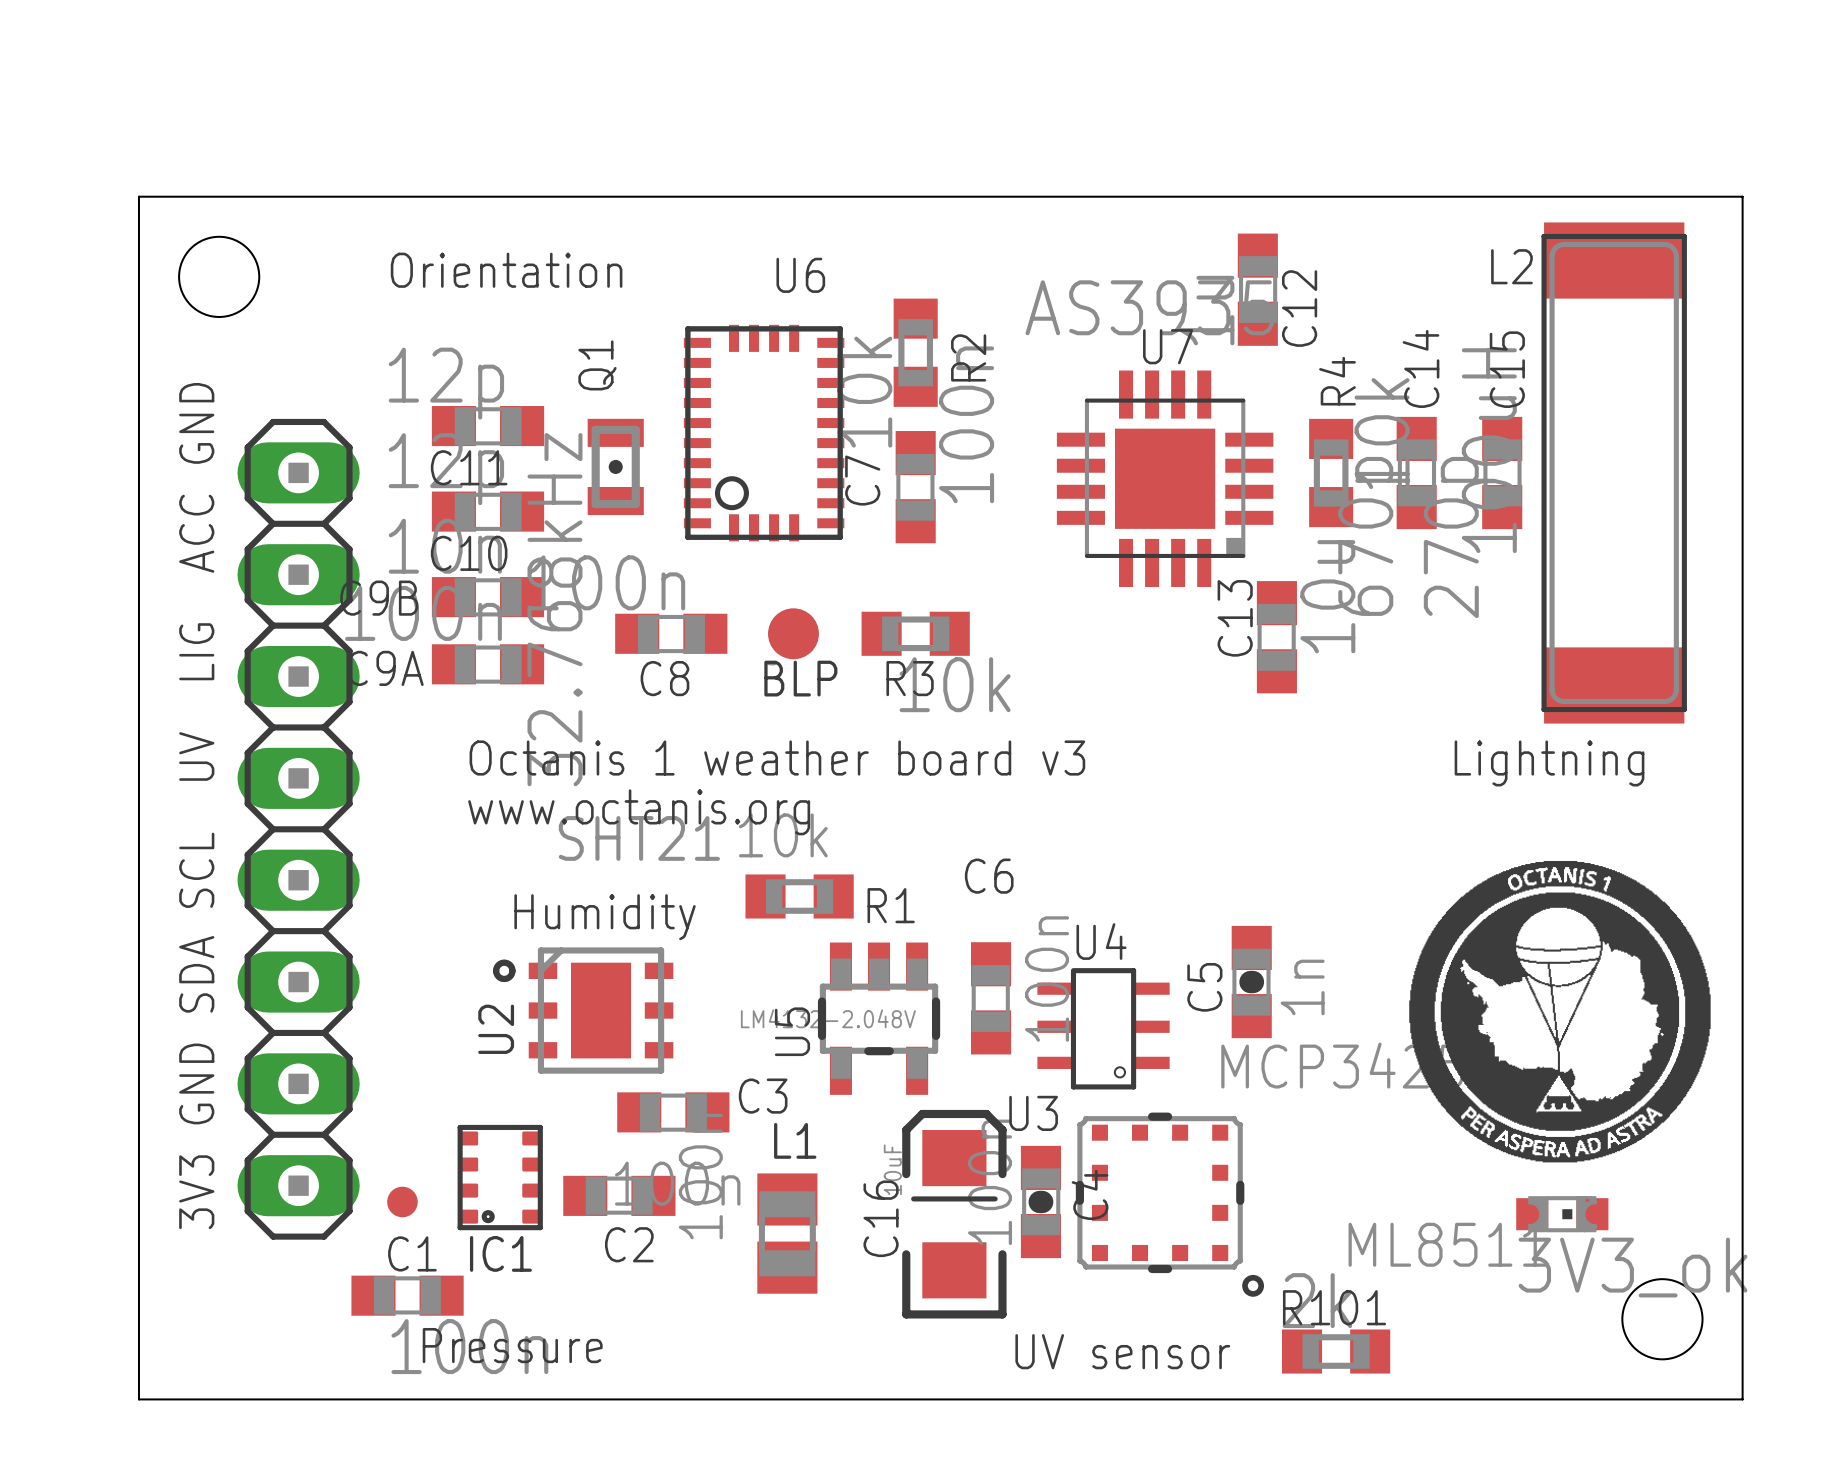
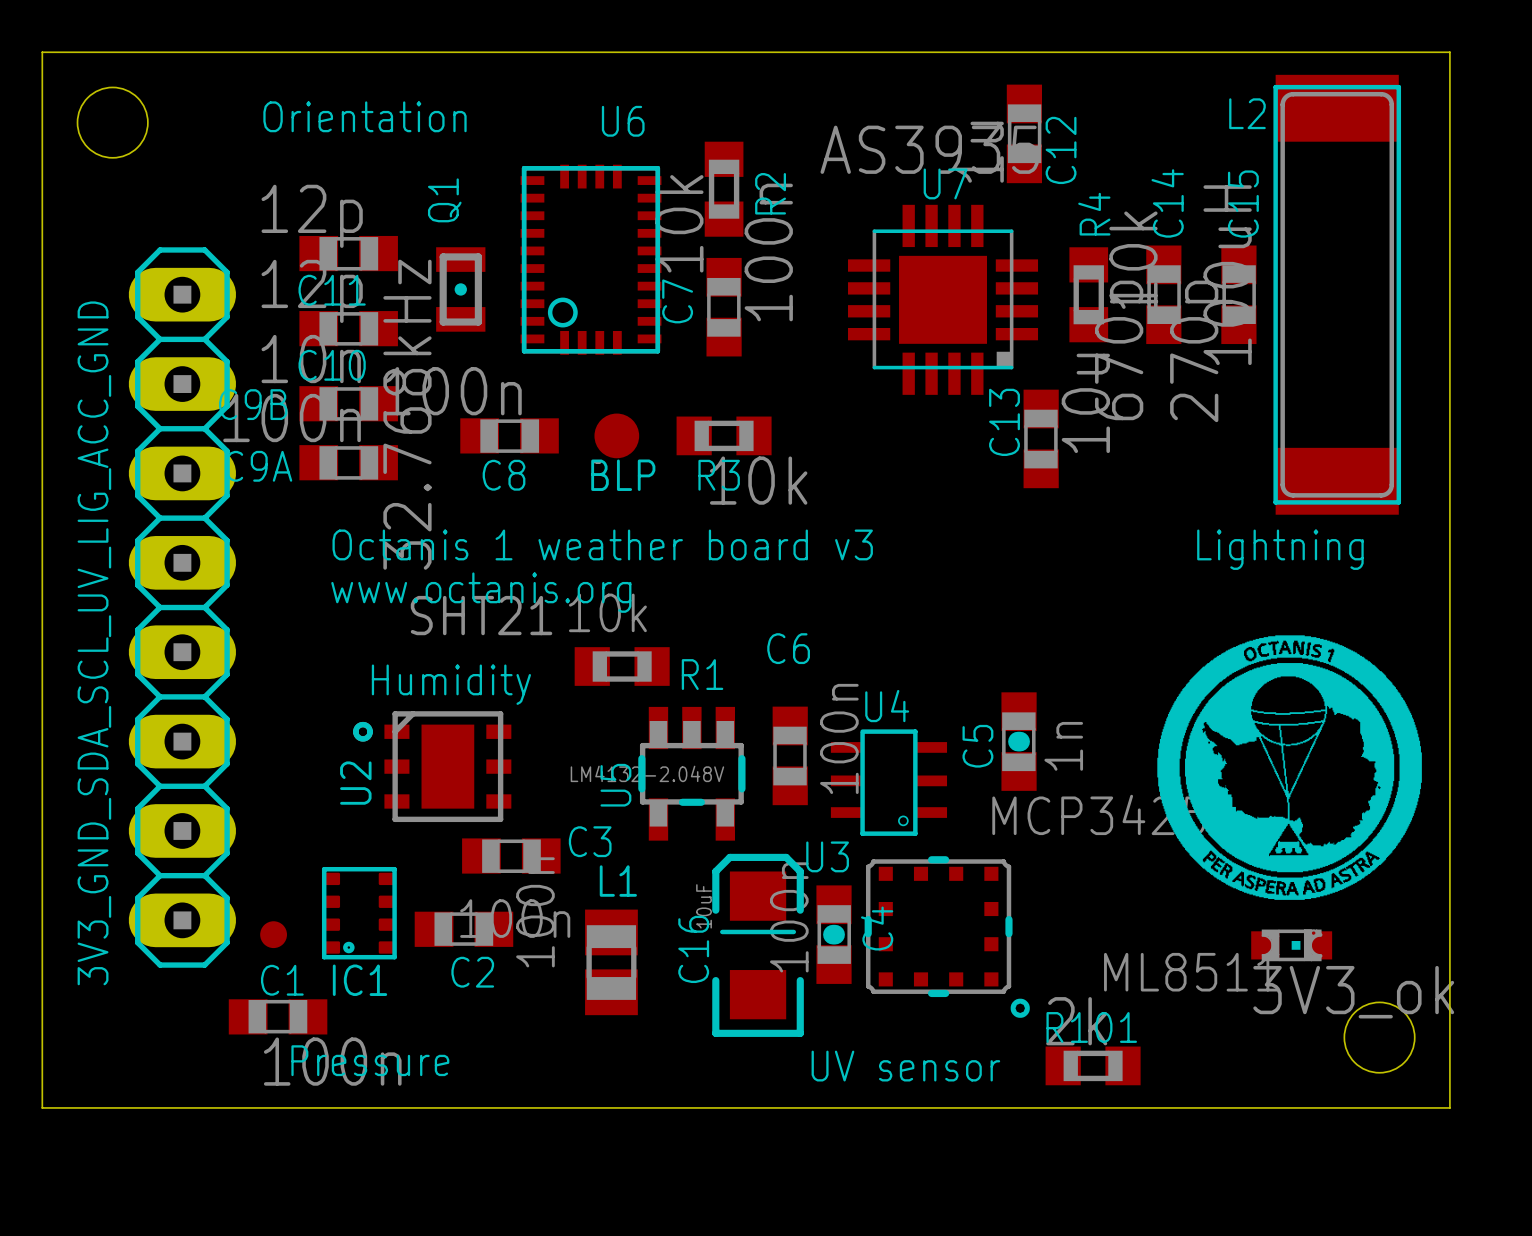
text: 3V3 GND SDA SCL UV LIG ACC GND (196, 806) -> 3V3_GND_SDA_SCL_UV_LIG_ACC_GND (94, 643)

